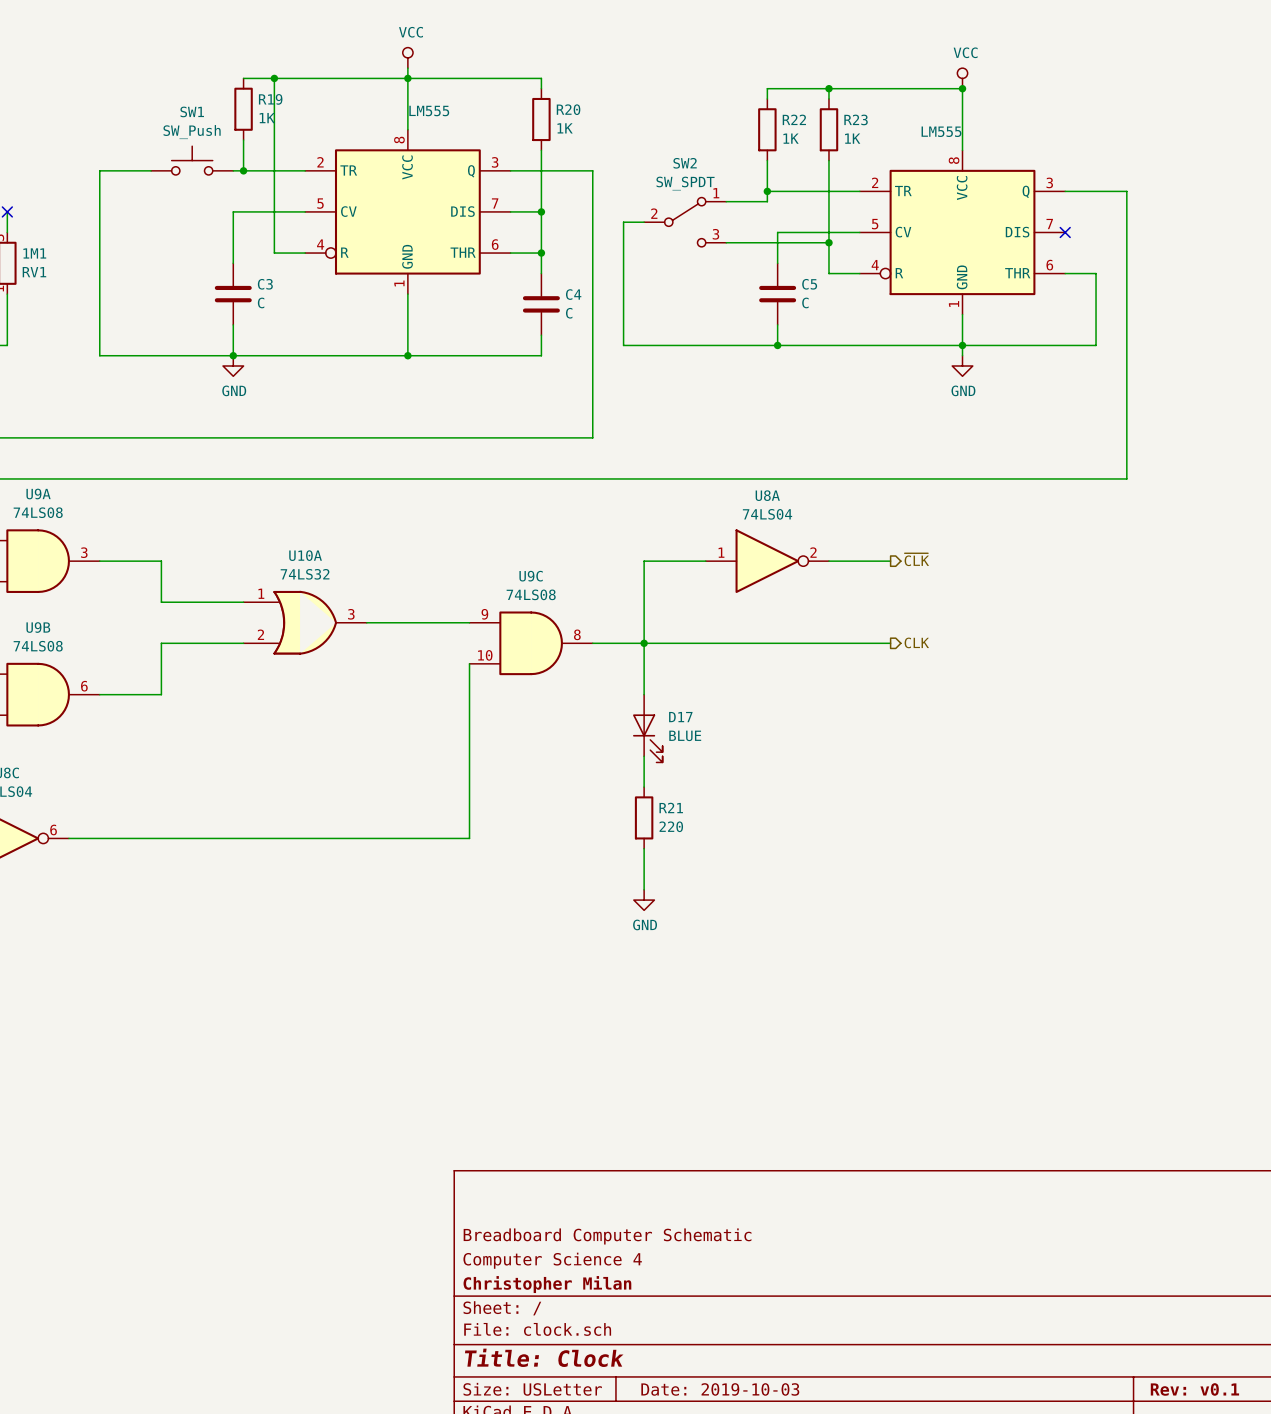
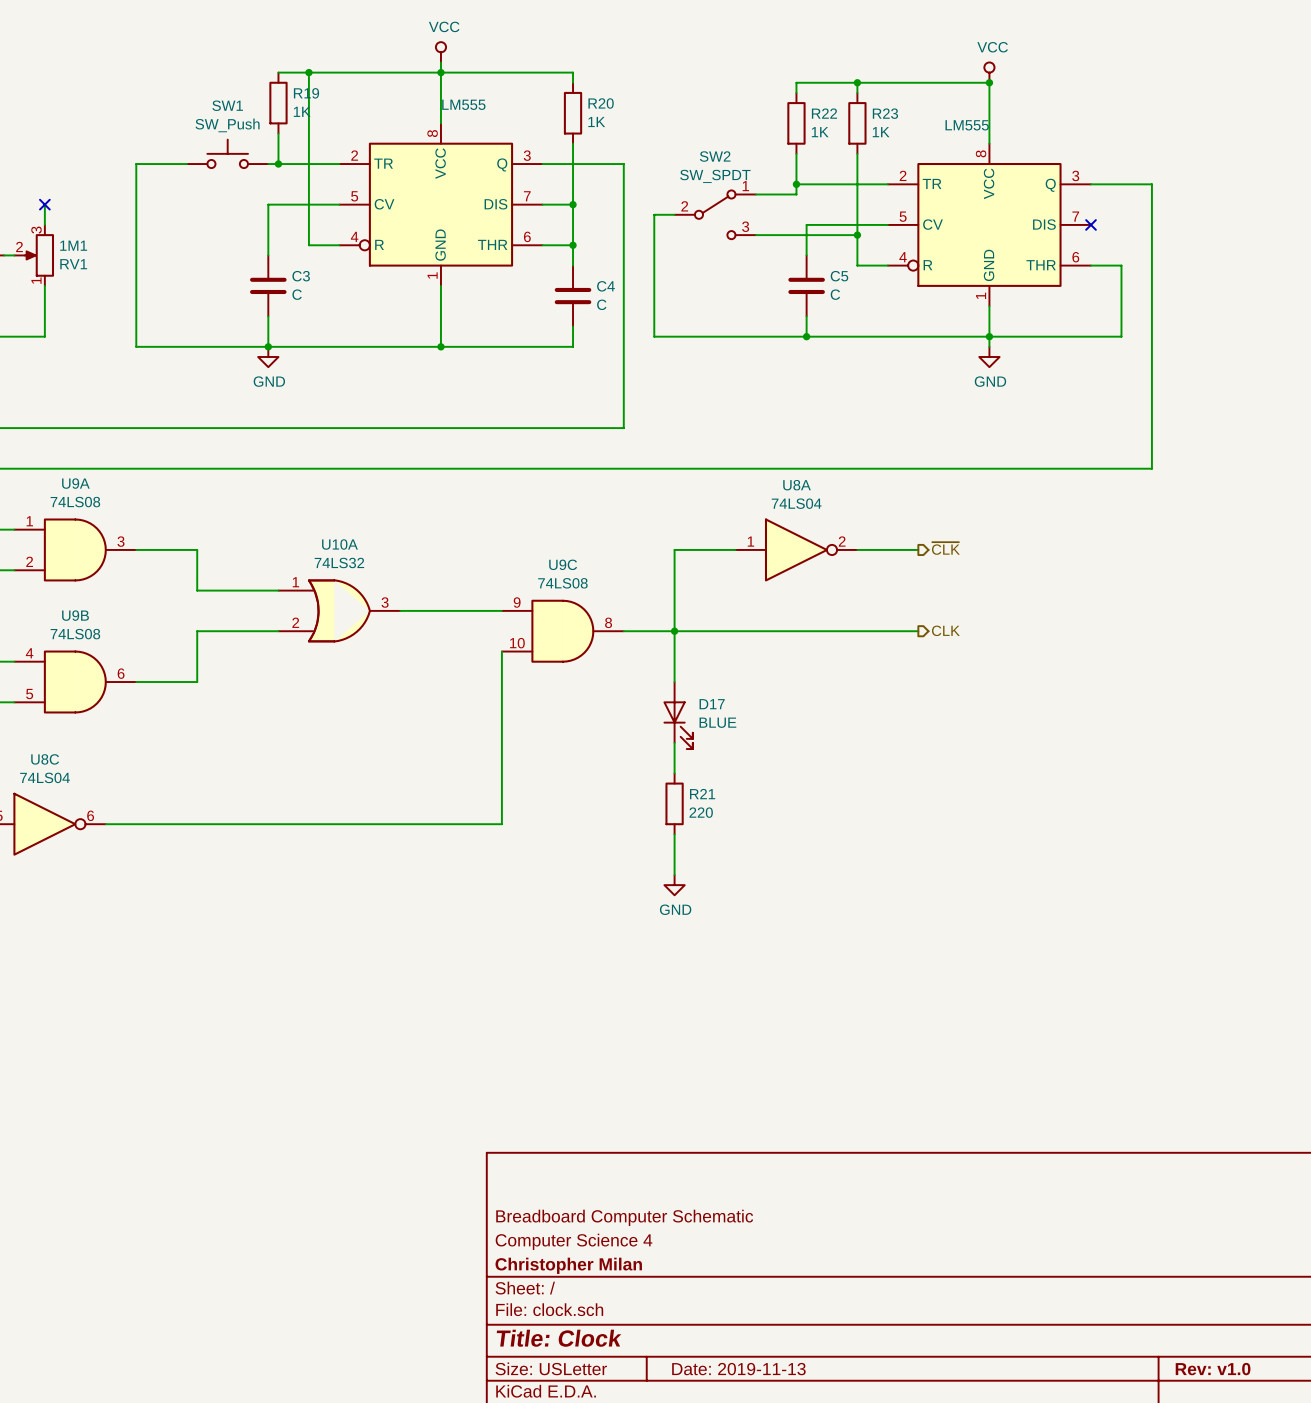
title block: Date: 2019-10-03 (720, 1389) -> Date: 2019-11-13 (738, 1369)
title block: Rev: v0.1 (1194, 1389) -> Rev: v1.0 (1213, 1369)

